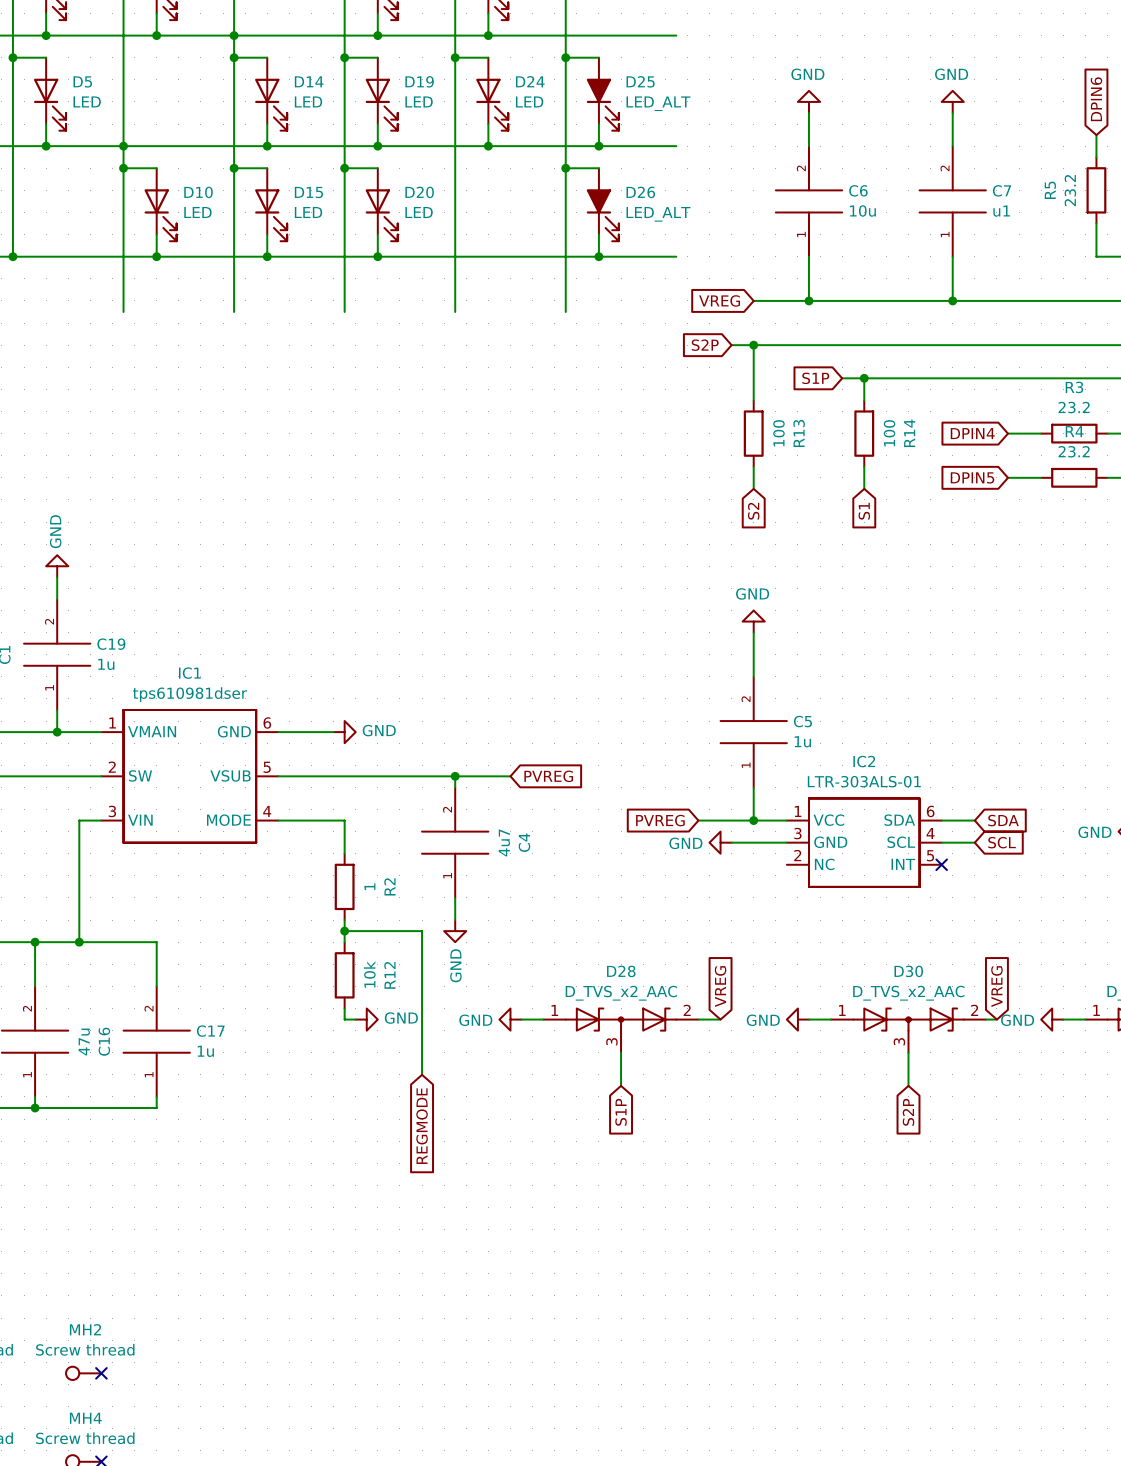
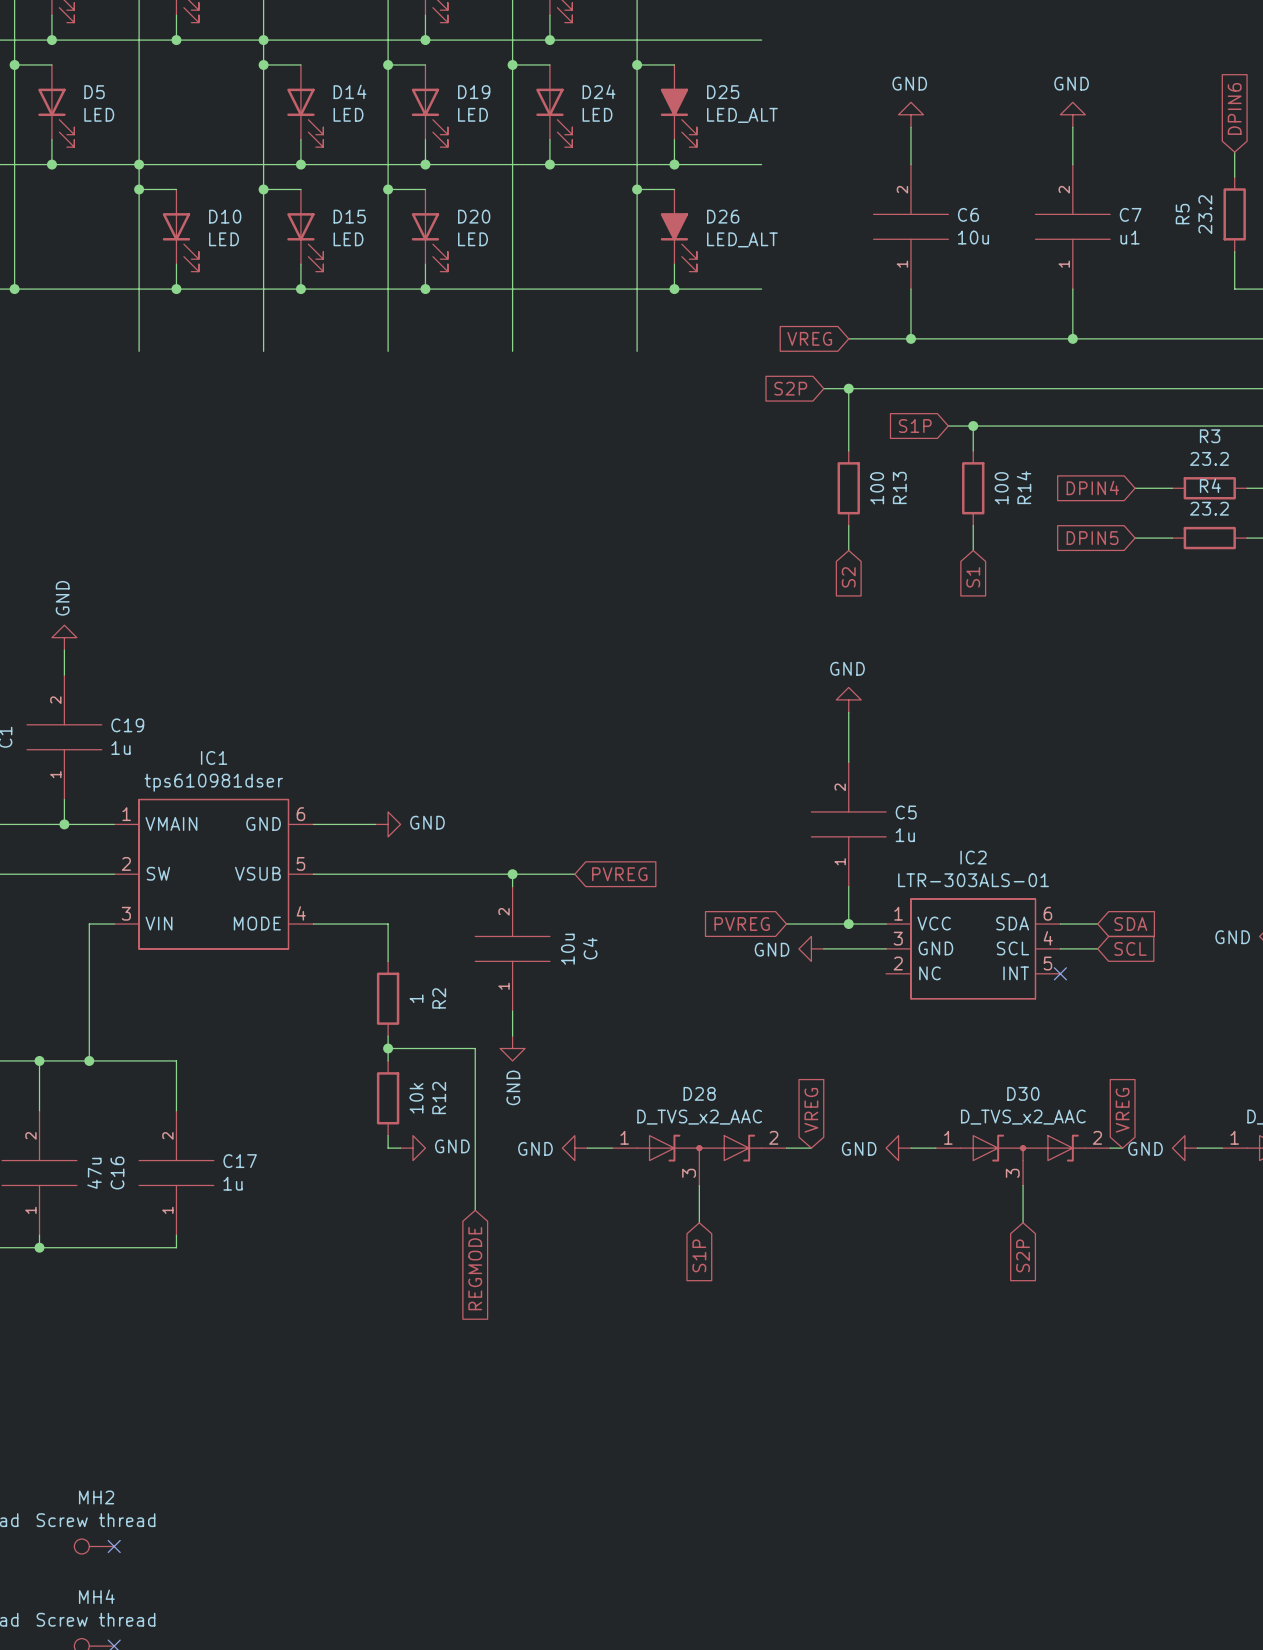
C4 value: 4u7 (504, 842) -> 10u (567, 949)

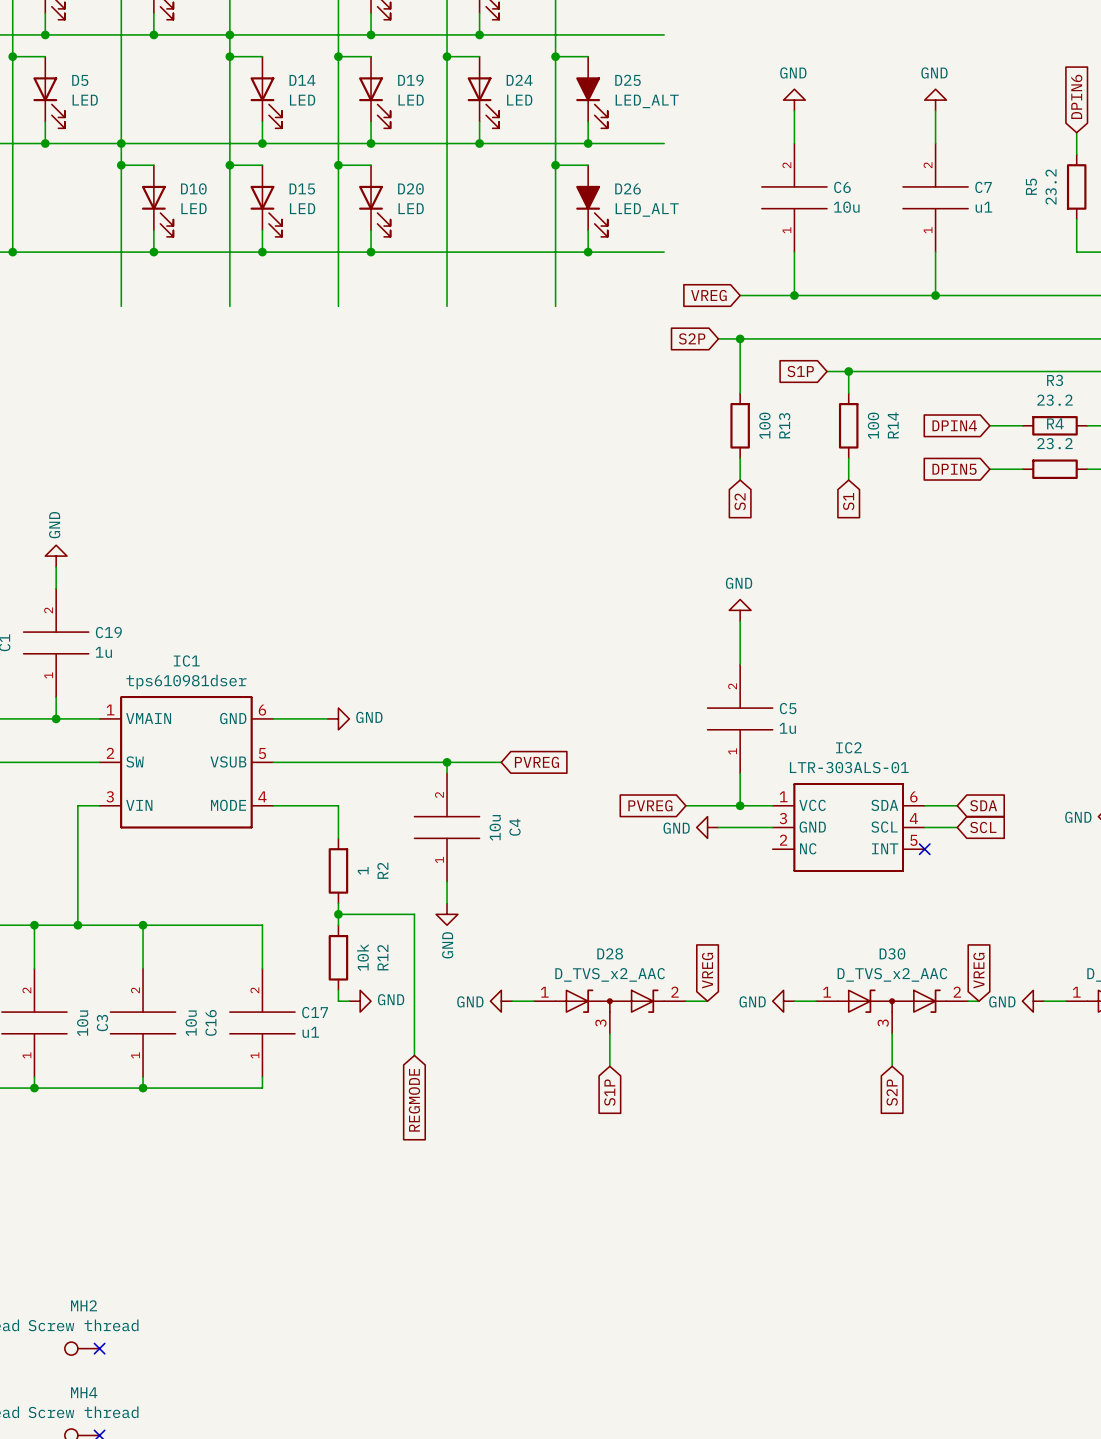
wire: none -> (143, 925) (143, 968)
junction: none -> (143, 925)
wire: (176, 1060) (176, 1110) -> (153, 925) (262, 925) (262, 968)
C16 value: 47u (94, 1173) -> 10u (82, 1023)
C16 name: C16 (117, 1173) -> C3 (102, 1023)
C16: none -> 10u (143, 1022)
C17 position: (176, 1173) -> (262, 1022)
C17 value: 1u (233, 1183) -> u1 (310, 1032)
wire: none -> (143, 1077) (143, 1088)
wire: (176, 1235) (176, 1247) -> (262, 1077) (262, 1088) (153, 1088)
junction: none -> (143, 1088)

